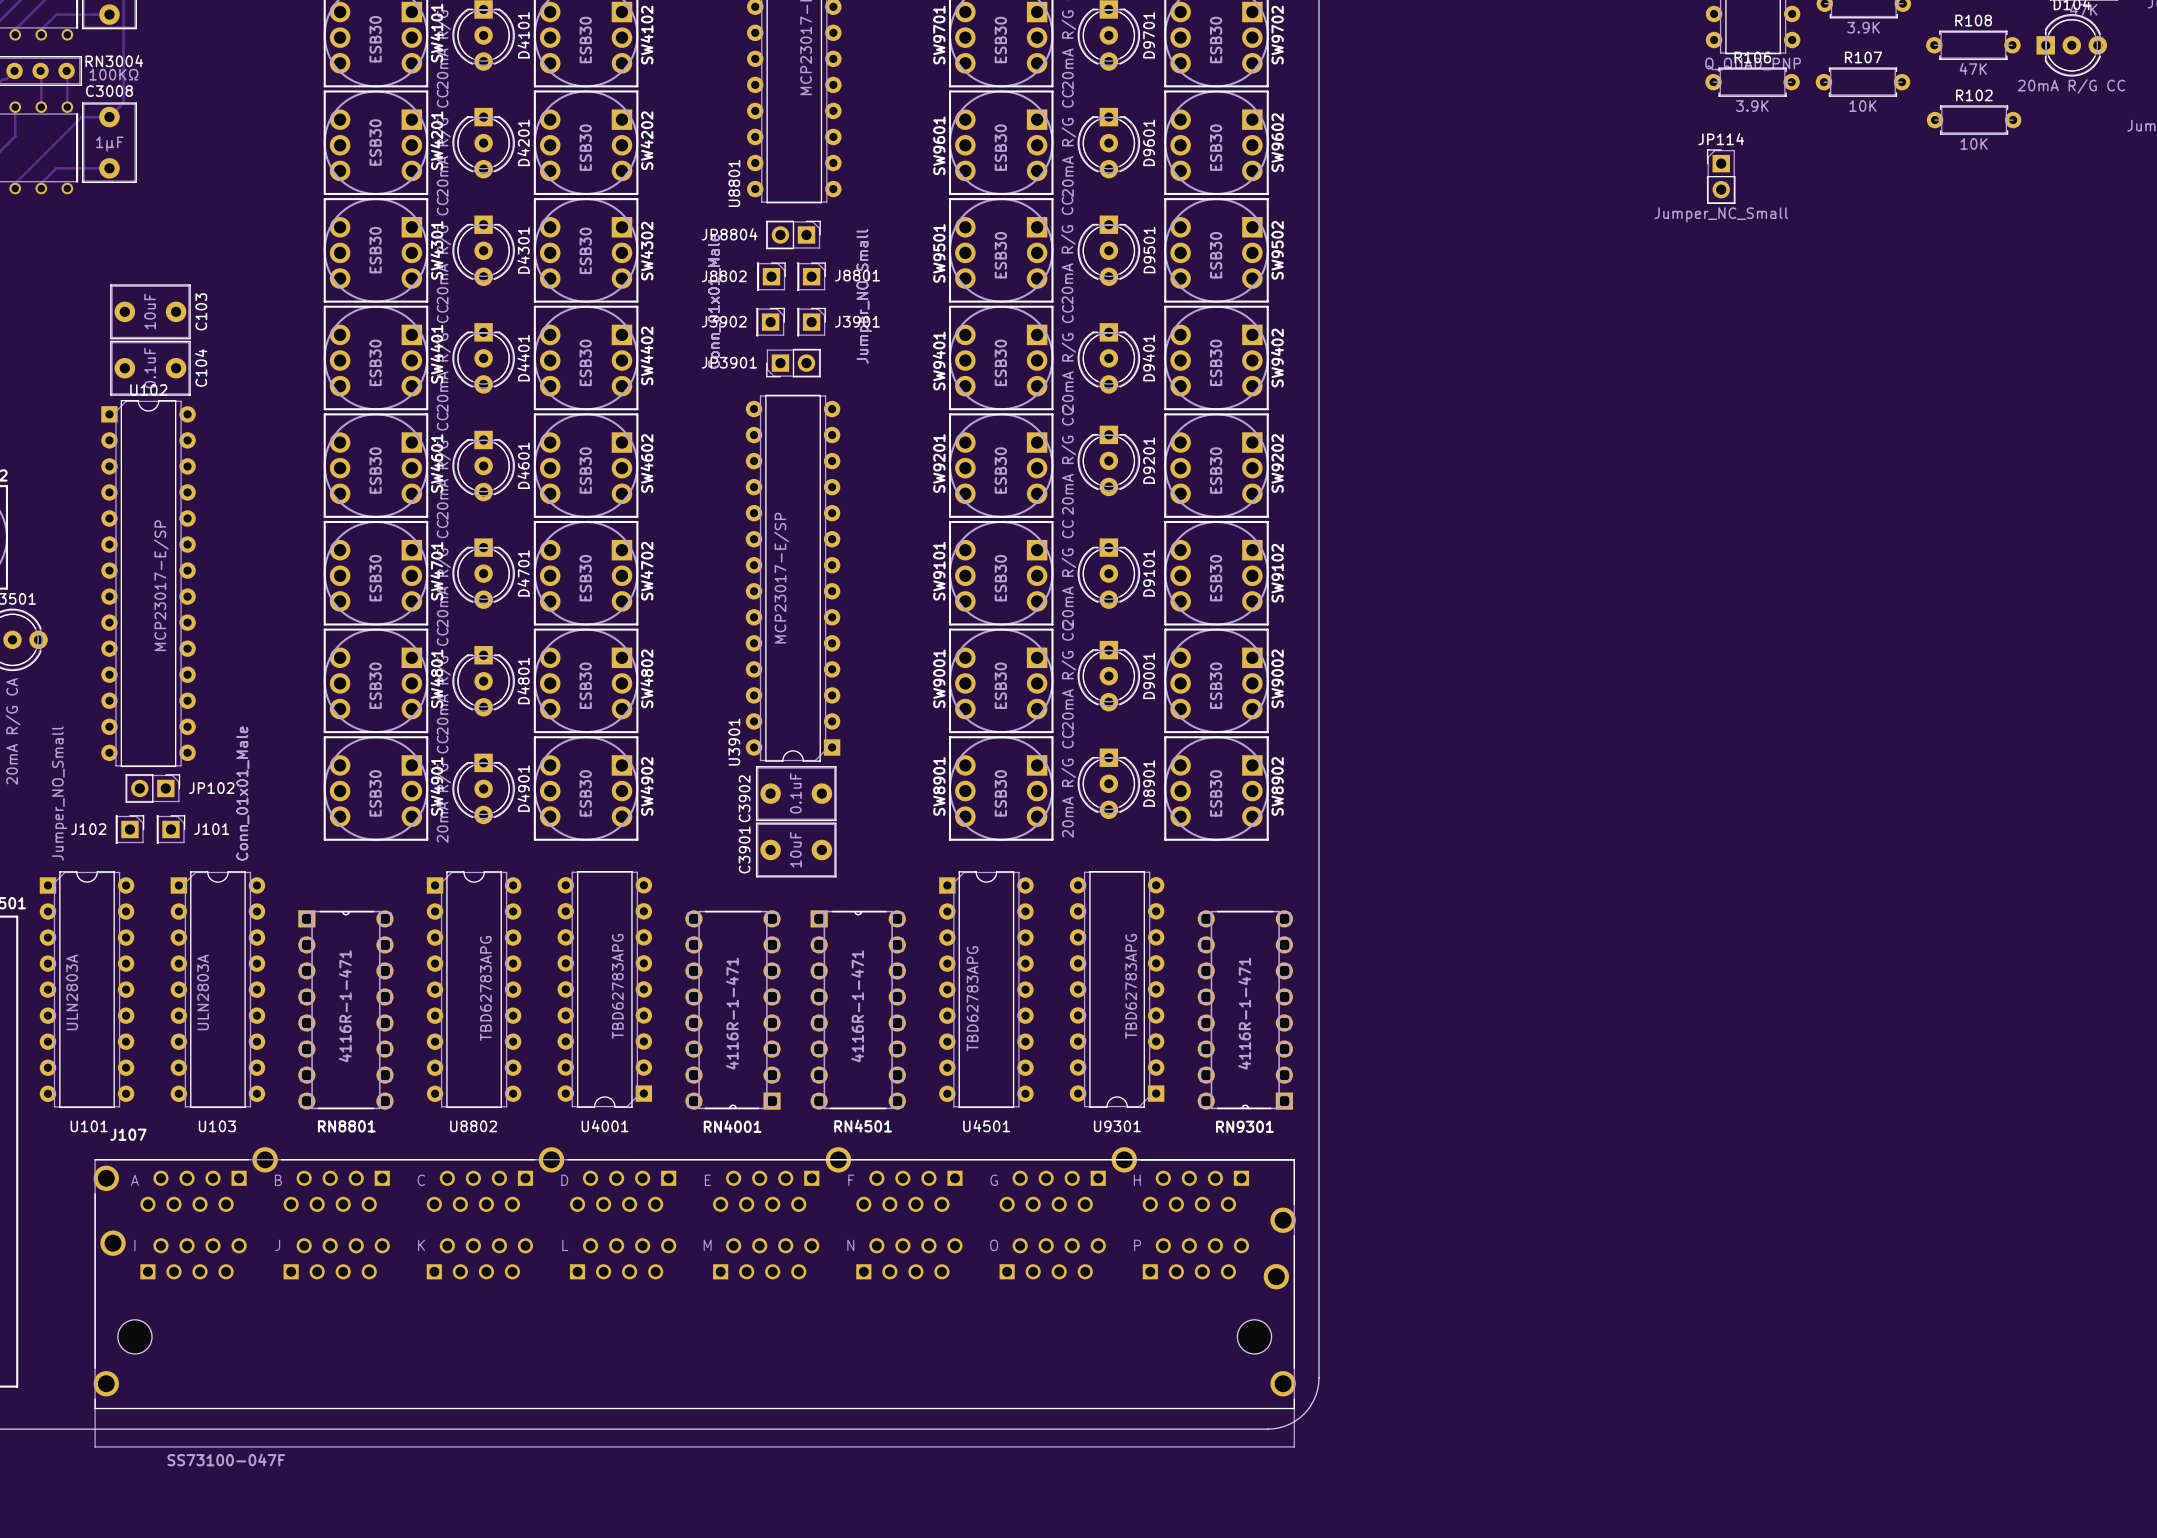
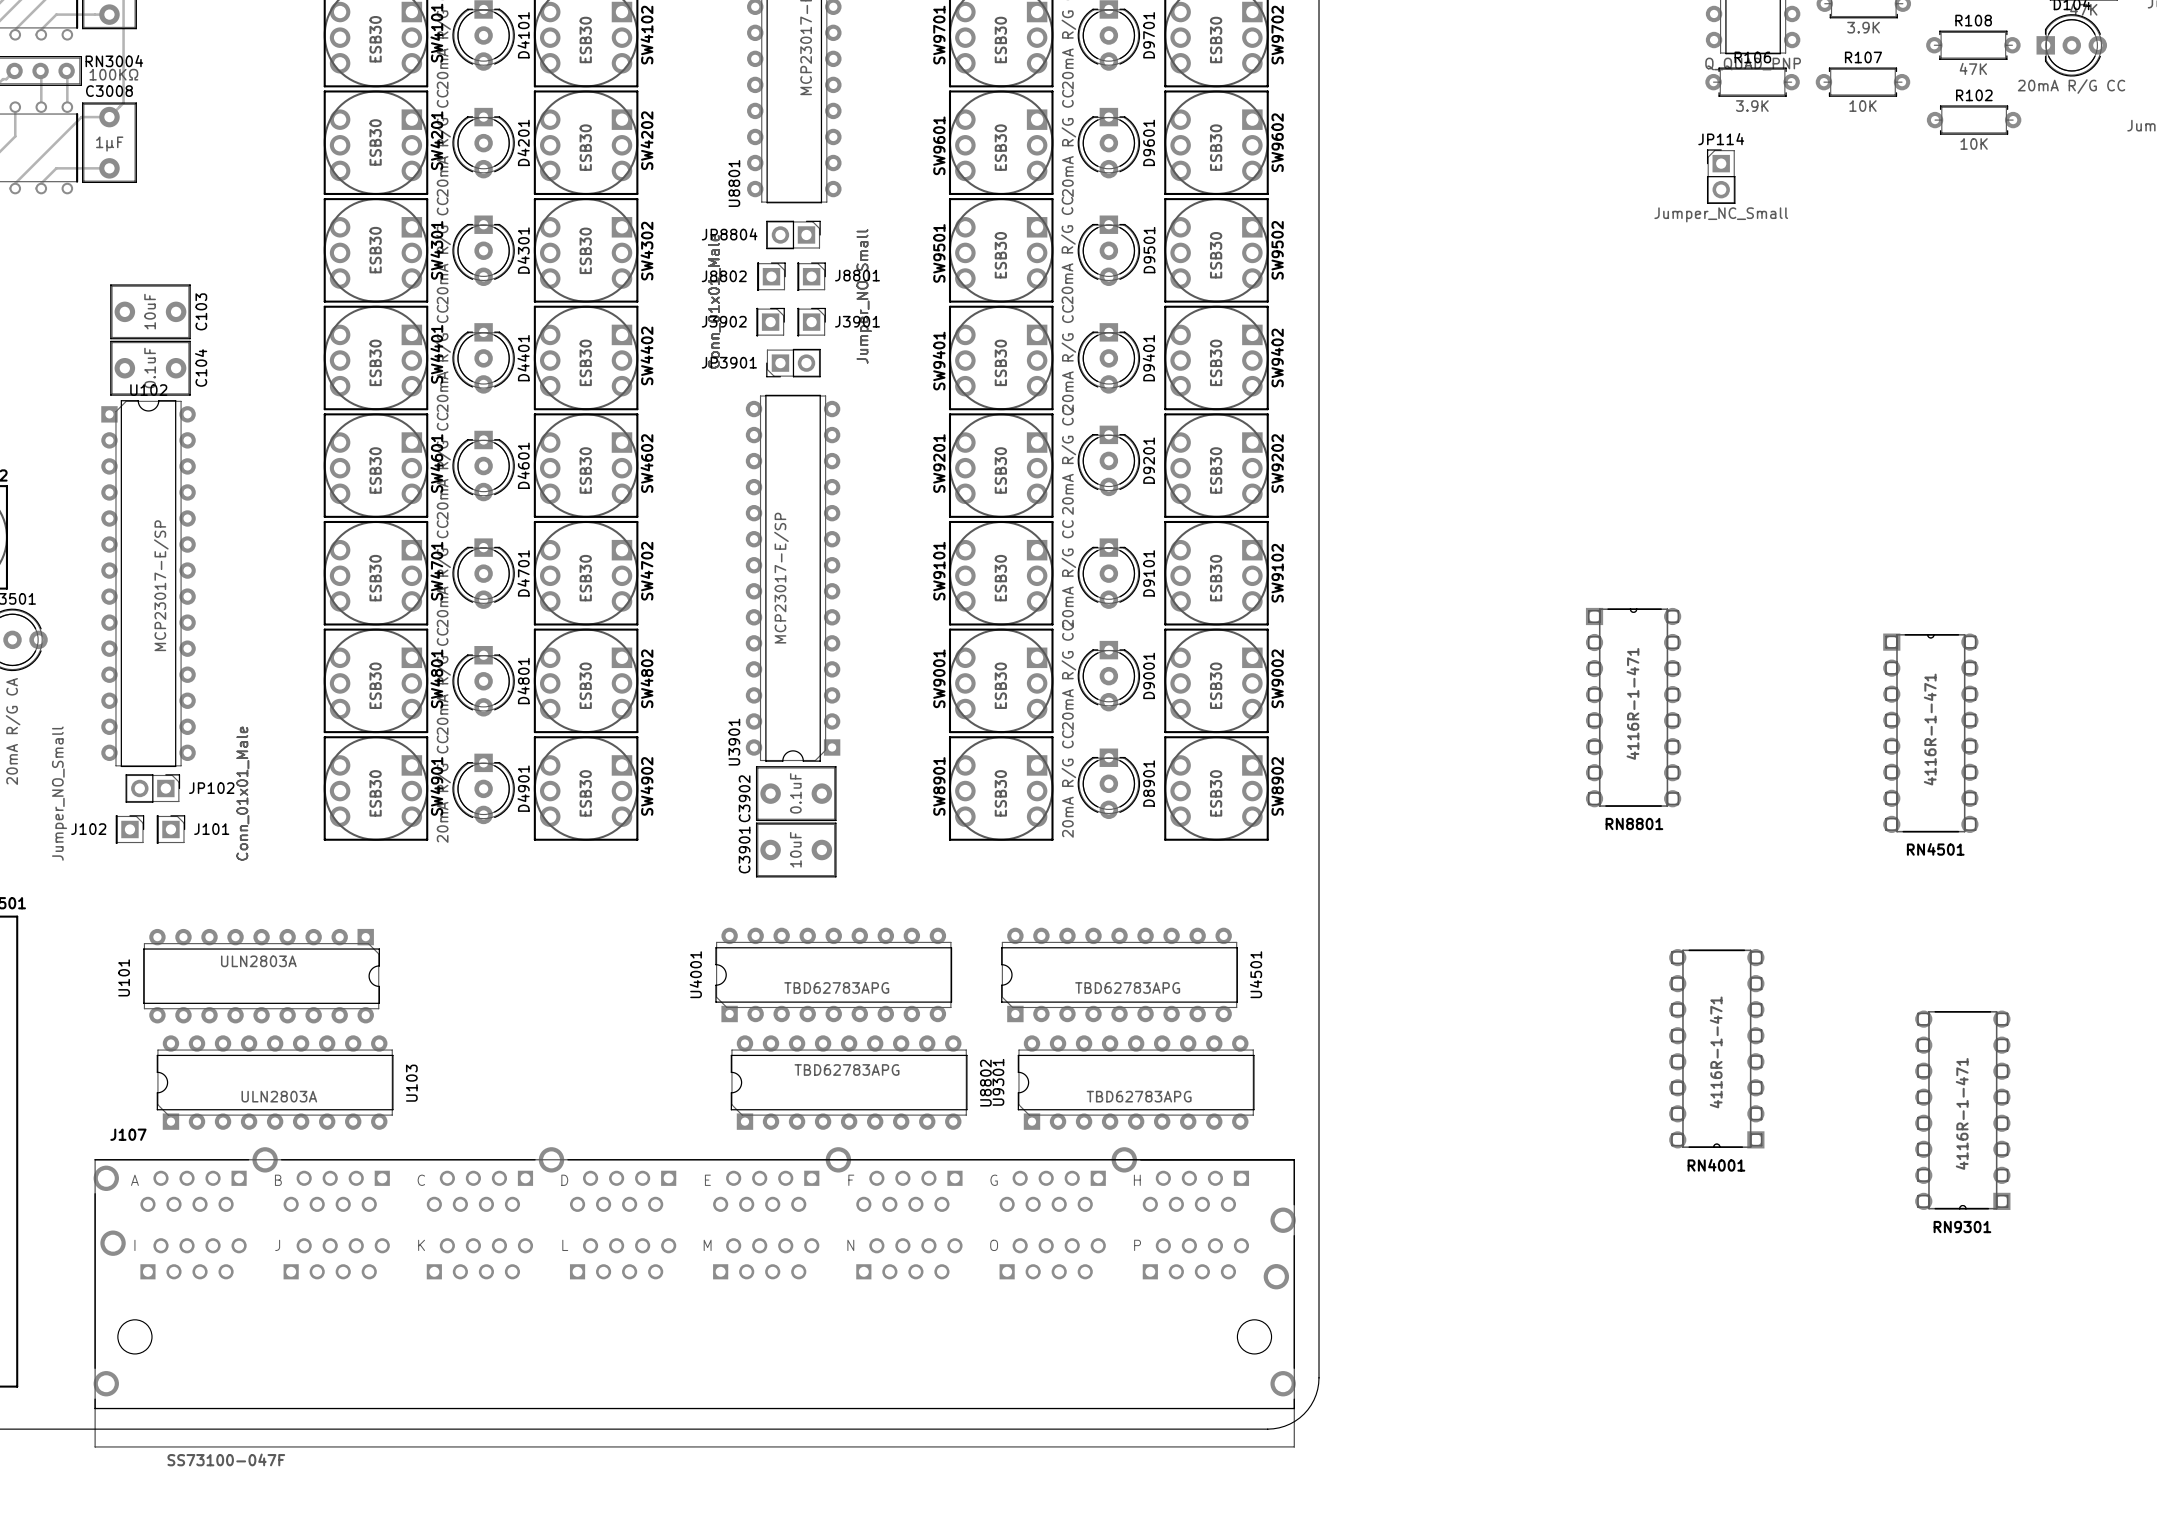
U101 rotation: 0° (87, 989) -> 90° clockwise (261, 976)
U101 position: (87, 989) -> (261, 976)
U103 rotation: 0° (217, 989) -> 90° counterclockwise (275, 1082)
U8802 rotation: 0° (474, 989) -> 90° counterclockwise (849, 1082)
U8802 position: (474, 989) -> (849, 1082)
U4001 rotation: 0° (604, 989) -> 90° clockwise (833, 974)
U4001 position: (604, 989) -> (833, 974)
U4501 rotation: 0° (986, 989) -> 90° counterclockwise (1119, 974)
U9301 rotation: 0° (1117, 989) -> 90° clockwise (1136, 1082)
RN8801 position: (345, 1010) -> (1633, 707)
RN4001 position: (732, 1010) -> (1716, 1048)
RN4501 position: (858, 1010) -> (1930, 733)
RN9301 position: (1245, 1010) -> (1962, 1110)

